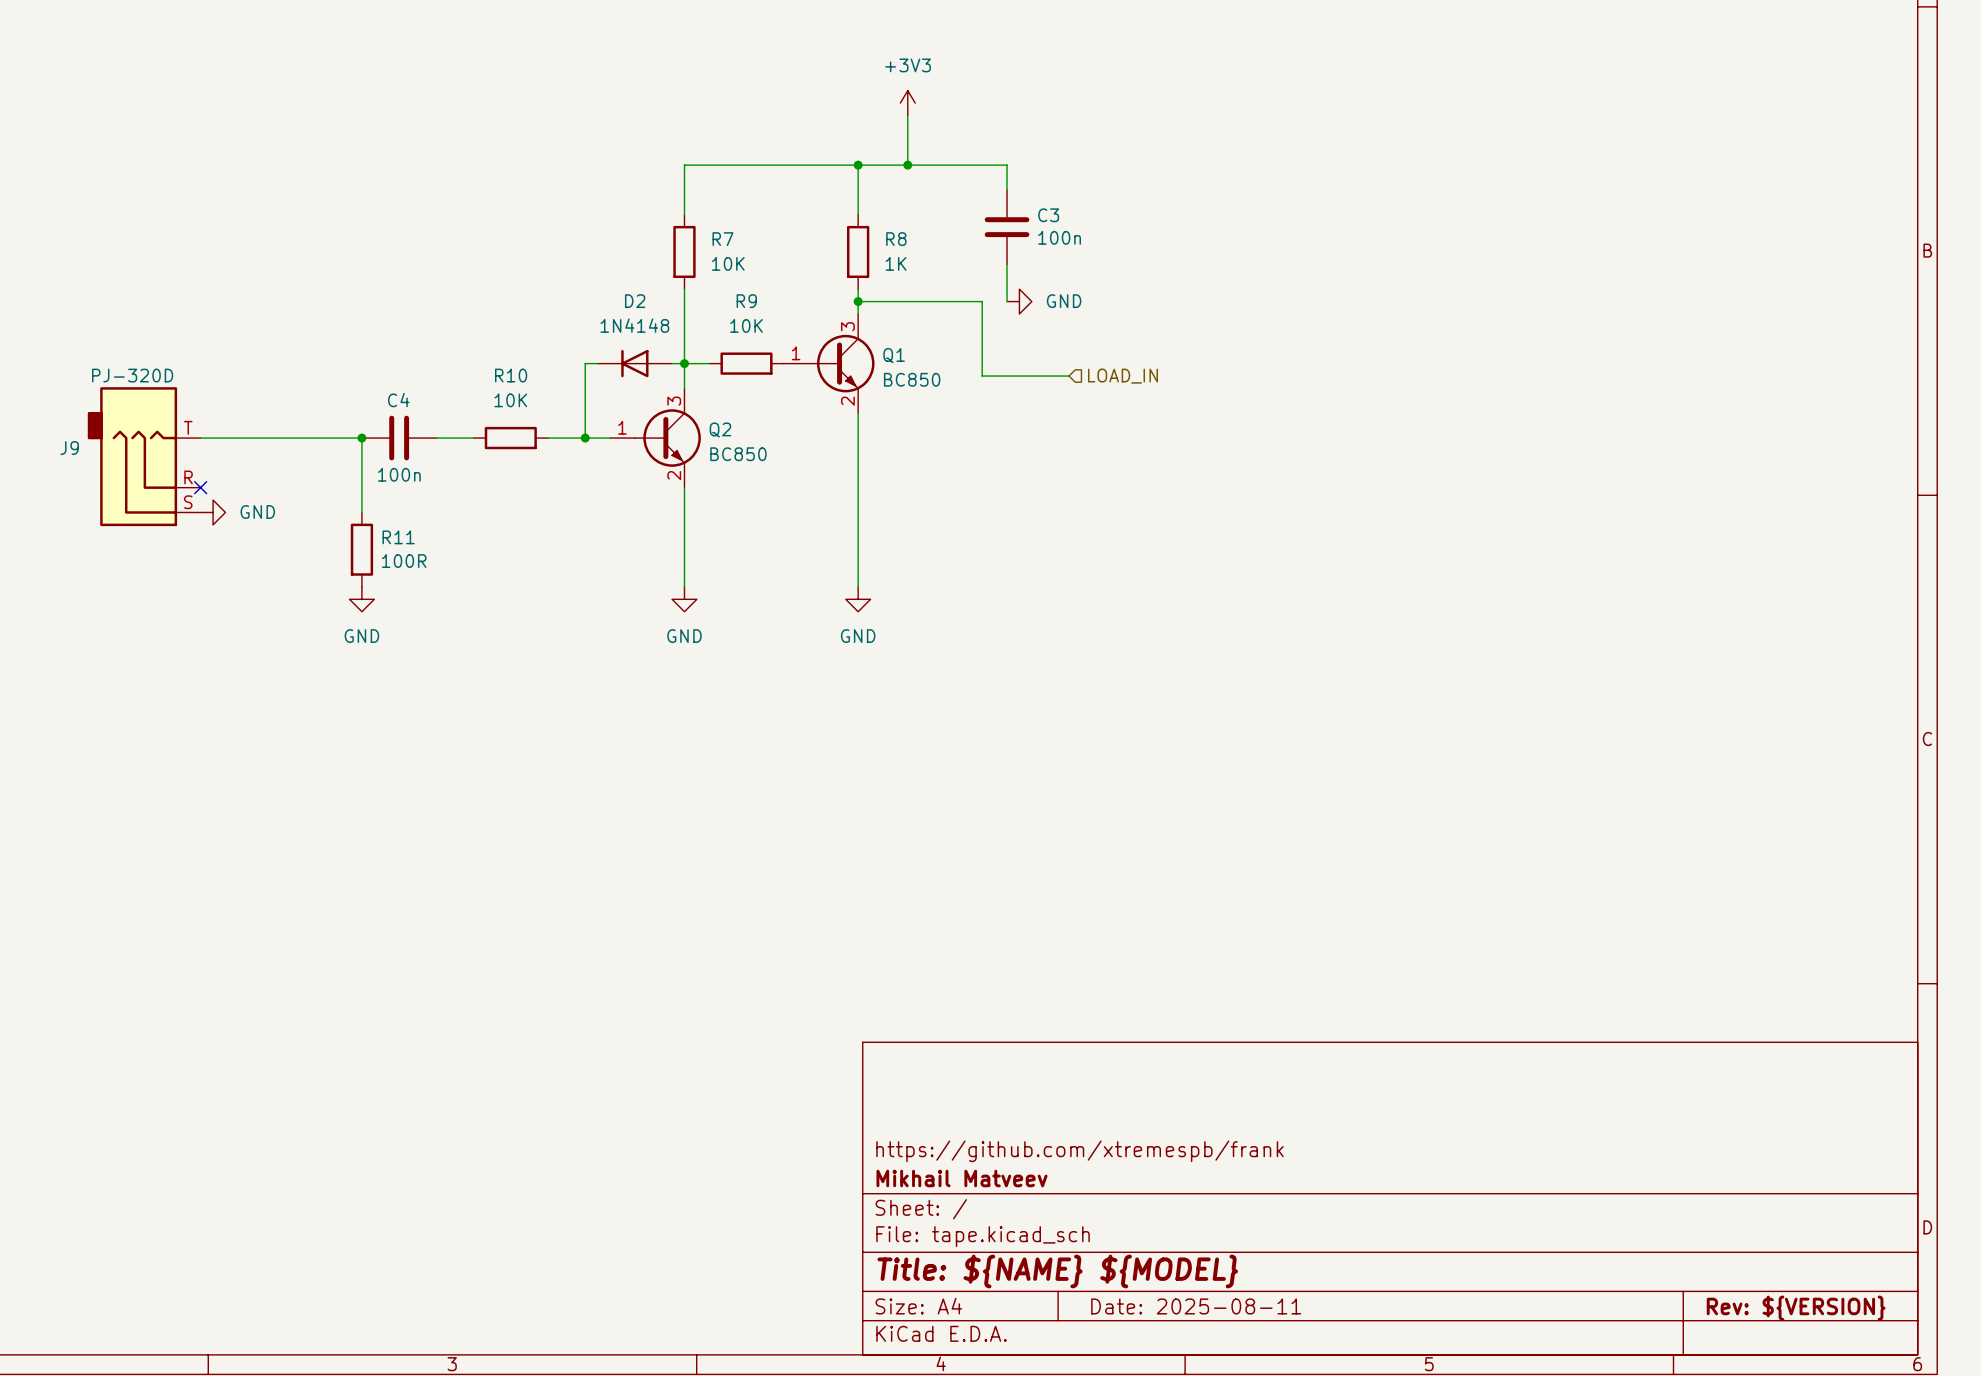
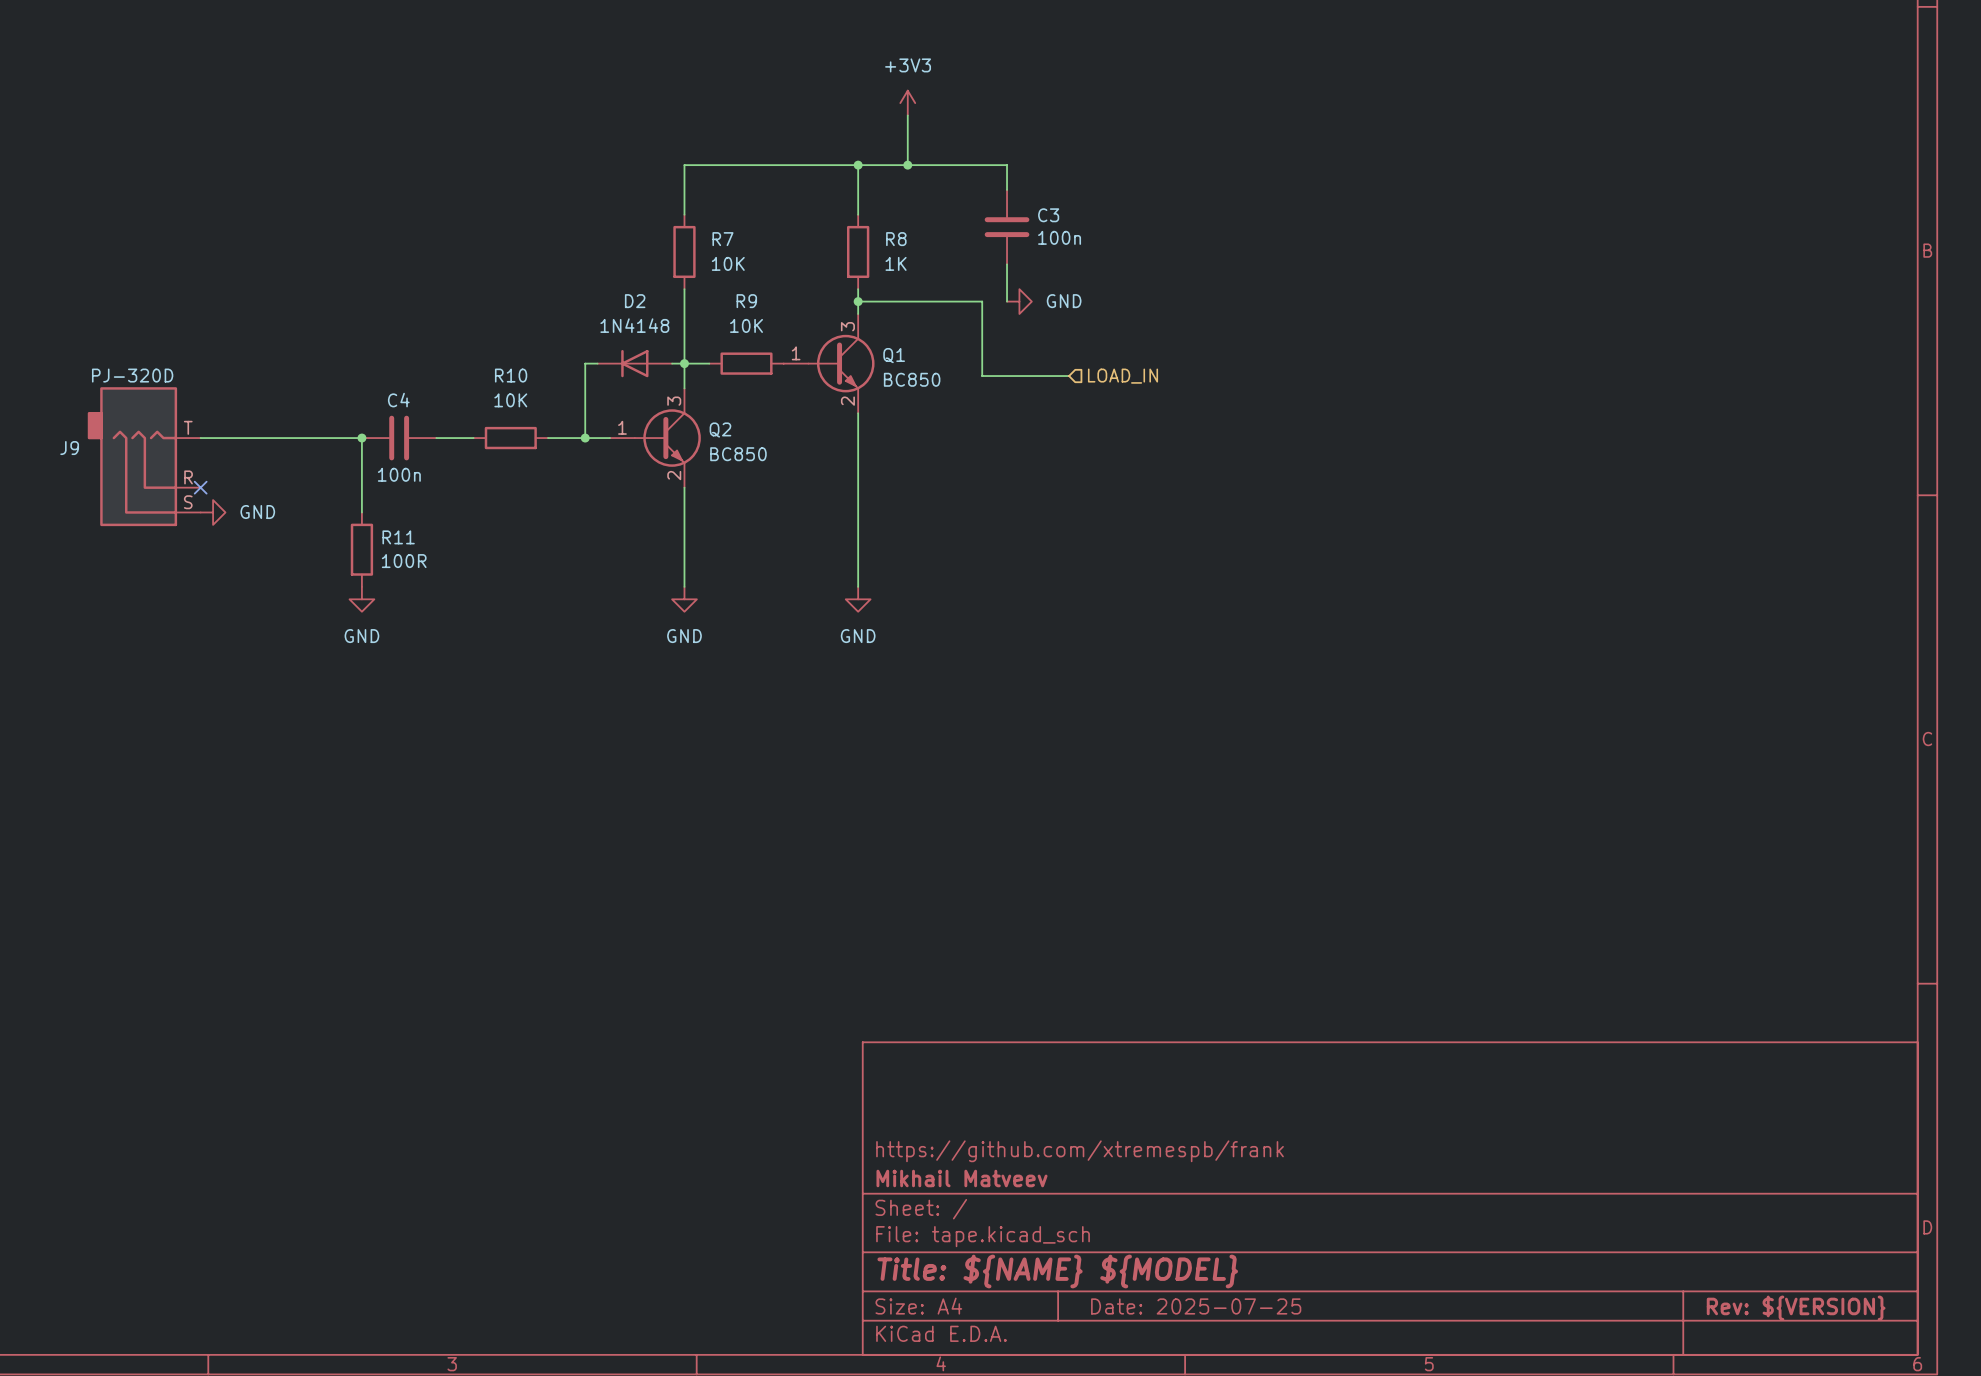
title block: Date: 2025-08-11 (1196, 1306) -> Date: 2025-07-25 (1196, 1306)

